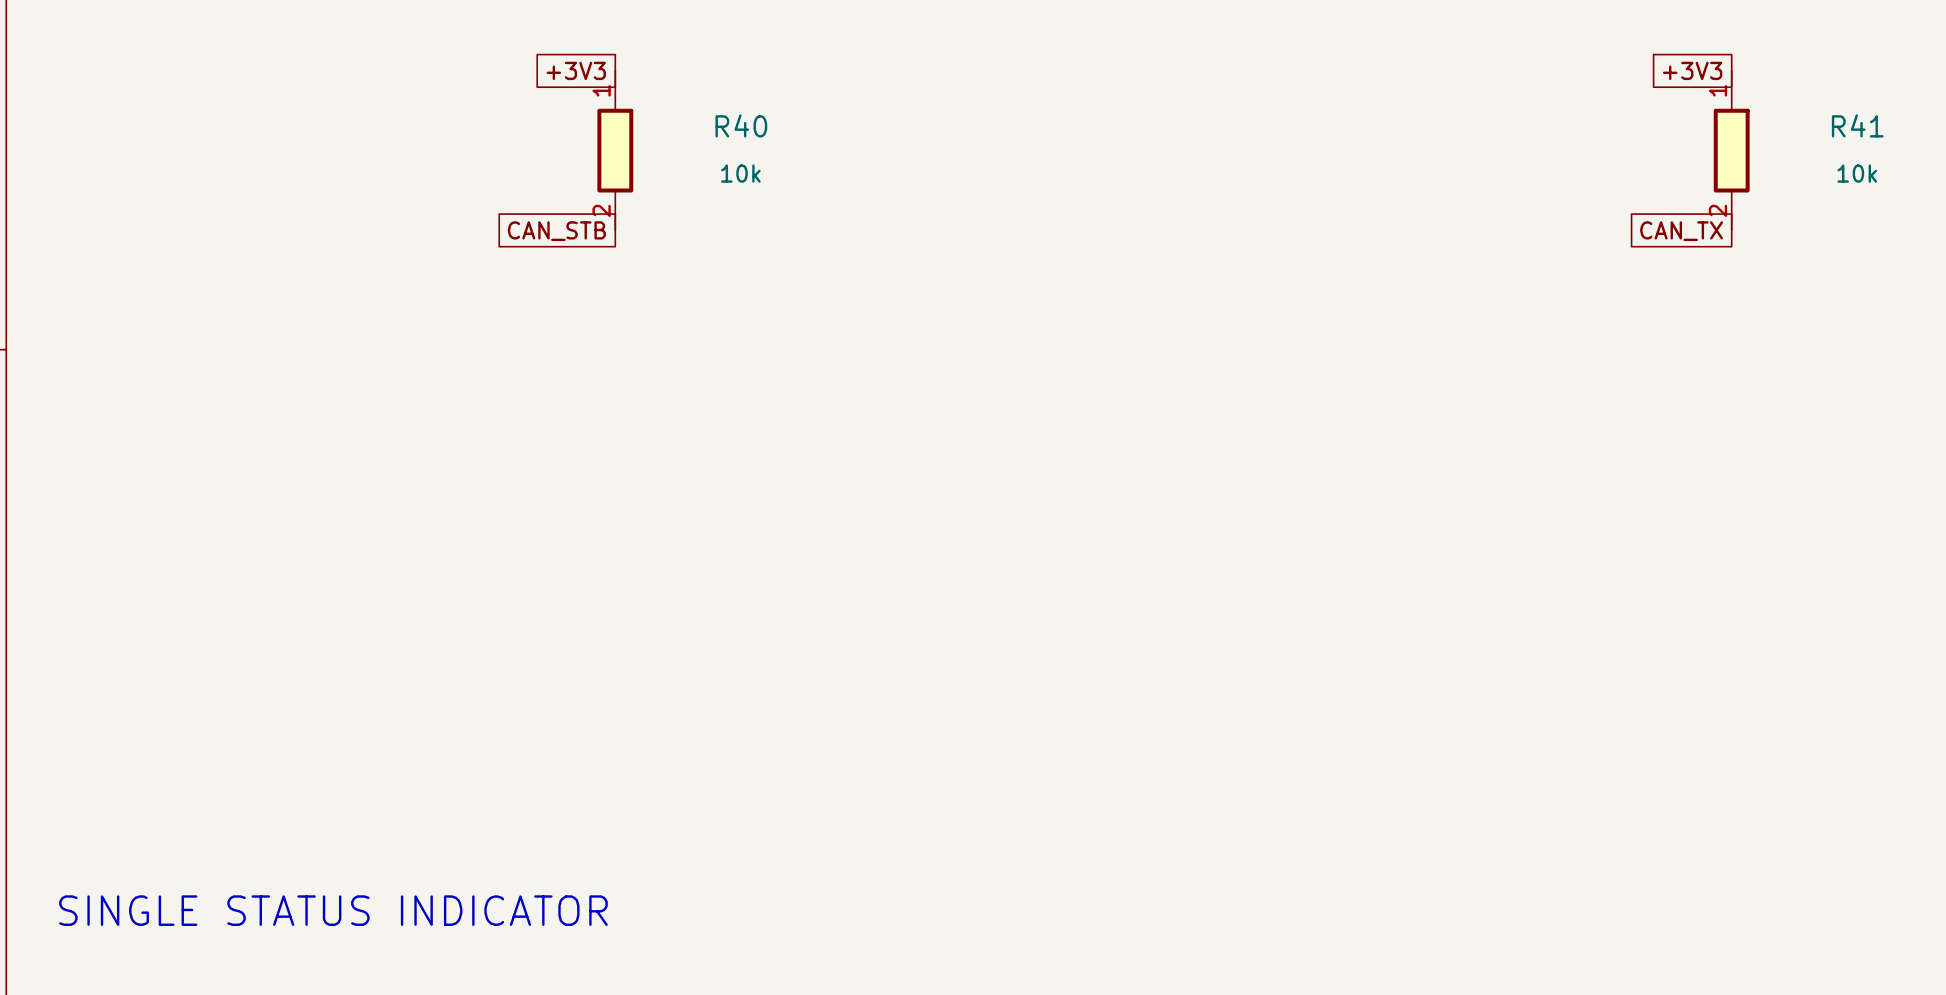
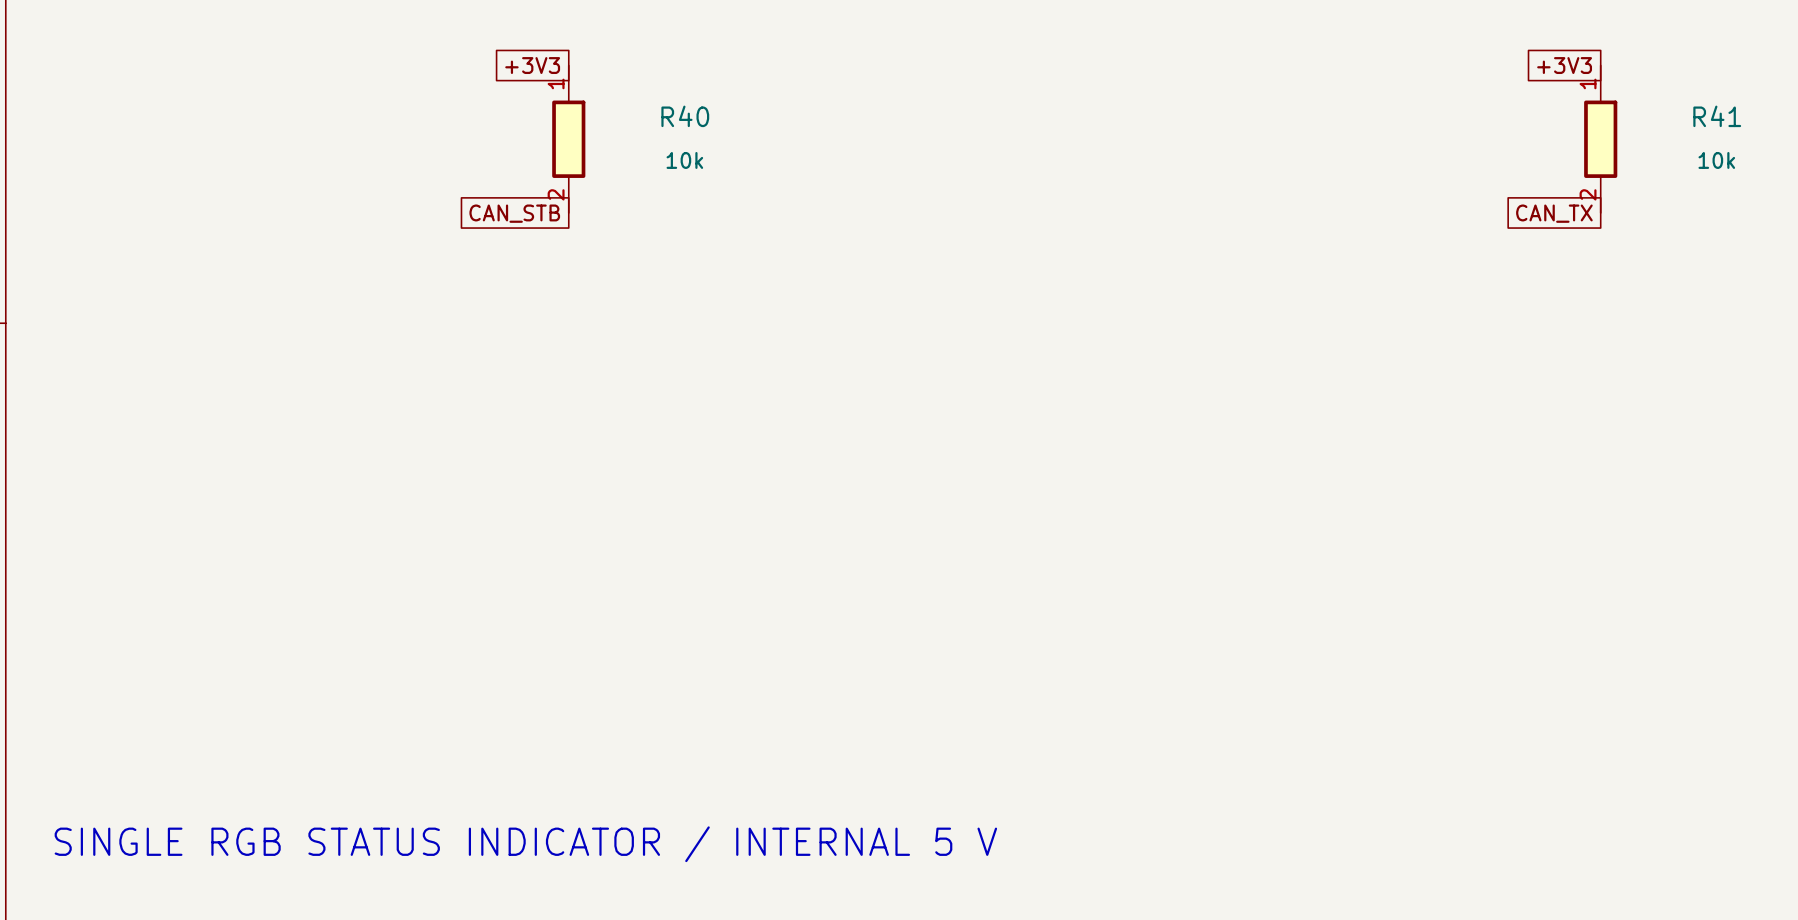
text: SINGLE STATUS INDICATOR (333, 910) -> SINGLE RGB STATUS INDICATOR / INTERNAL 5 V (525, 844)

